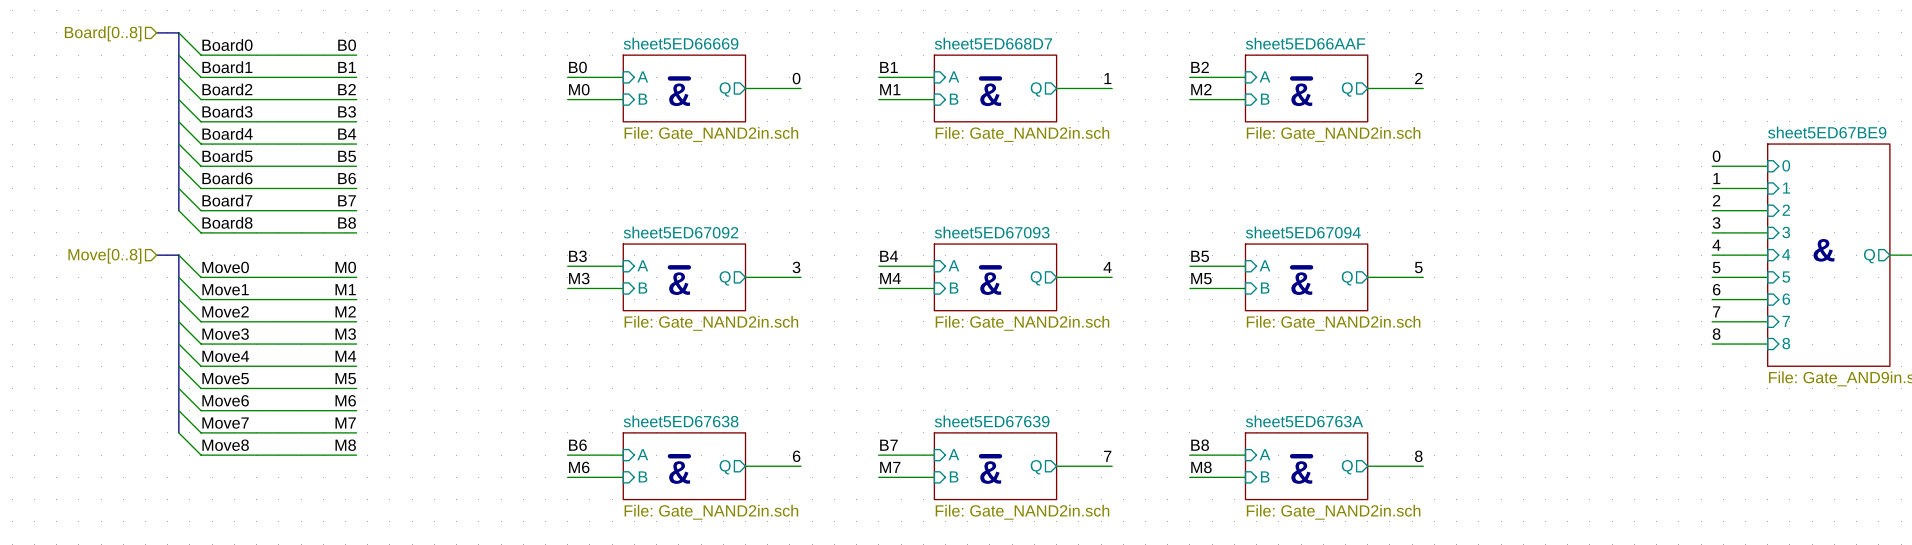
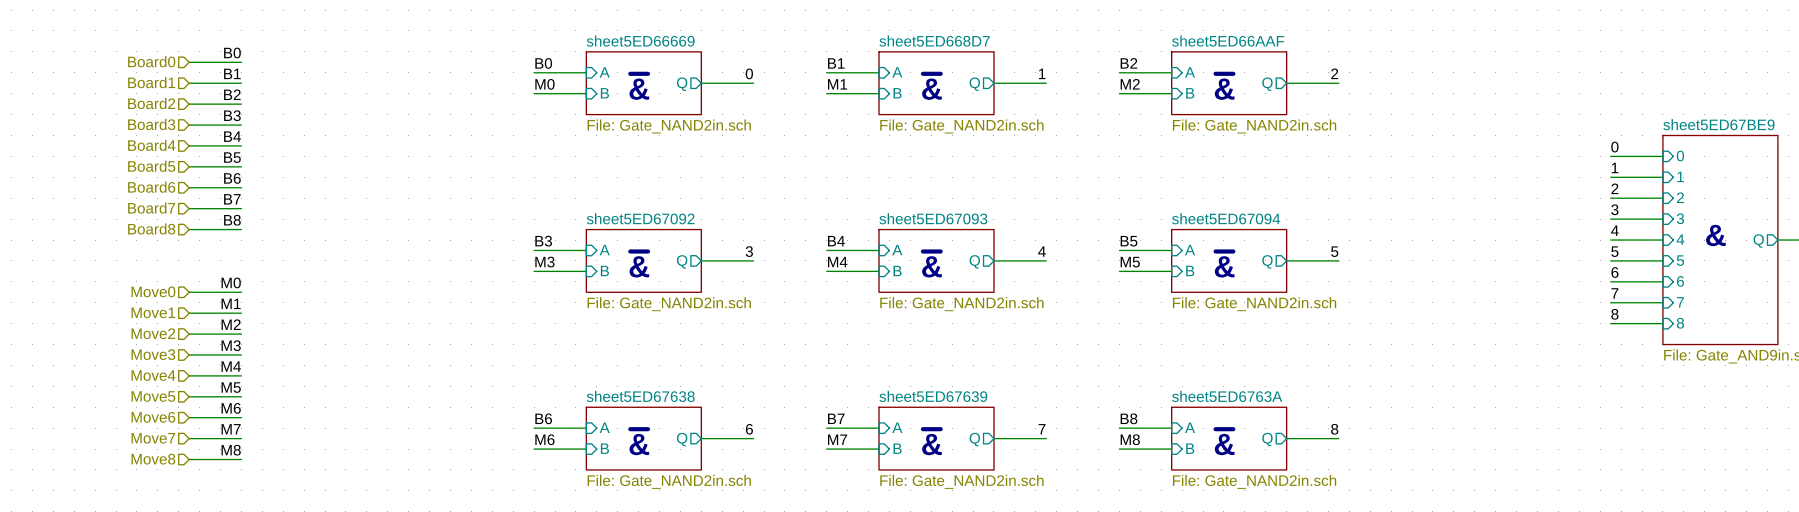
bus: (156, 32) (178, 32) (178, 210) -> none
wire: (178, 32) (201, 55) (356, 55) -> none
hierarchical label: Board[0..8] (103, 33) -> none
label: Board0 (227, 45) -> none
label position: B0 (347, 45) -> B0 (232, 53)
wire: (178, 55) (201, 77) (356, 77) -> none
hierarchical label: none -> Board0 (151, 61)
wire: none -> (189, 62) (241, 62)
label: Board1 (227, 67) -> none
label position: B1 (347, 67) -> B1 (232, 73)
wire: (178, 77) (201, 99) (356, 99) -> none
hierarchical label: none -> Board1 (151, 82)
wire: none -> (189, 83) (241, 83)
label: Board2 (227, 89) -> none
label position: B2 (347, 89) -> B2 (232, 94)
wire: (178, 99) (201, 121) (356, 121) -> none
hierarchical label: none -> Board2 (151, 103)
wire: none -> (189, 104) (241, 104)
label: Board3 (227, 111) -> none
label position: B3 (347, 111) -> B3 (232, 115)
wire: (178, 121) (201, 144) (356, 144) -> none
hierarchical label: none -> Board3 (151, 124)
wire: none -> (189, 125) (241, 125)
label: Board4 (227, 133) -> none
label position: B4 (347, 134) -> B4 (232, 136)
wire: (178, 144) (201, 166) (356, 166) -> none
hierarchical label: none -> Board4 (151, 145)
wire: none -> (189, 145) (241, 145)
label: Board5 (227, 156) -> none
label position: B5 (347, 156) -> B5 (232, 157)
wire: (178, 166) (201, 188) (356, 188) -> none
hierarchical label: none -> Board5 (151, 166)
wire: none -> (189, 166) (241, 166)
label: Board6 (227, 178) -> none
label position: B6 (347, 178) -> B6 (232, 178)
wire: (178, 188) (201, 210) (356, 210) -> none
hierarchical label: none -> Board6 (151, 187)
wire: none -> (189, 187) (241, 187)
label: Board7 (227, 200) -> none
label position: B7 (347, 200) -> B7 (232, 199)
wire: (178, 210) (201, 232) (356, 232) -> none
hierarchical label: none -> Board7 (151, 208)
wire: none -> (189, 208) (241, 208)
label: Board8 (227, 222) -> none
label position: B8 (347, 223) -> B8 (232, 220)
hierarchical label: none -> Board8 (151, 228)
wire: none -> (189, 229) (241, 229)
bus: (156, 255) (178, 255) (178, 432) -> none
wire: (178, 255) (201, 277) (356, 277) -> none
hierarchical label: Move[0..8] (104, 256) -> none
label: Move0 (225, 267) -> none
label position: M0 (345, 267) -> M0 (231, 282)
wire: (178, 277) (201, 299) (356, 299) -> none
label: Move1 (225, 289) -> none
label position: M1 (345, 289) -> M1 (231, 303)
wire: (178, 299) (201, 321) (356, 321) -> none
hierarchical label: none -> Move0 (153, 291)
wire: none -> (189, 292) (241, 292)
label: Move2 (225, 311) -> none
label position: M2 (345, 311) -> M2 (231, 324)
wire: (178, 321) (201, 344) (356, 344) -> none
hierarchical label: none -> Move1 (153, 312)
wire: none -> (189, 313) (241, 313)
label: Move3 (225, 334) -> none
label position: M3 (345, 334) -> M3 (231, 345)
wire: (178, 344) (201, 366) (356, 366) -> none
hierarchical label: none -> Move2 (153, 333)
wire: none -> (189, 334) (241, 334)
label: Move4 (225, 356) -> none
label position: M4 (345, 356) -> M4 (231, 366)
wire: (178, 366) (201, 388) (356, 388) -> none
hierarchical label: none -> Move3 (153, 354)
wire: none -> (189, 354) (241, 354)
label: Move5 (225, 378) -> none
label position: M5 (345, 378) -> M5 (231, 387)
wire: (178, 388) (201, 410) (356, 410) -> none
hierarchical label: none -> Move4 (153, 375)
wire: none -> (189, 375) (241, 375)
label: Move6 (225, 400) -> none
label position: M6 (345, 400) -> M6 (231, 408)
wire: (178, 410) (201, 432) (356, 432) -> none
hierarchical label: none -> Move5 (153, 396)
wire: none -> (189, 396) (241, 396)
label position: M7 (345, 422) -> M7 (231, 429)
label: Move7 (225, 423) -> none
wire: (178, 432) (201, 455) (356, 455) -> none
hierarchical label: none -> Move6 (153, 417)
wire: none -> (189, 417) (241, 417)
label: Move8 (225, 445) -> none
label position: M8 (345, 445) -> M8 (231, 450)
hierarchical label: none -> Move7 (153, 438)
wire: none -> (189, 438) (241, 438)
hierarchical label: none -> Move8 (153, 459)
wire: none -> (189, 459) (241, 459)

